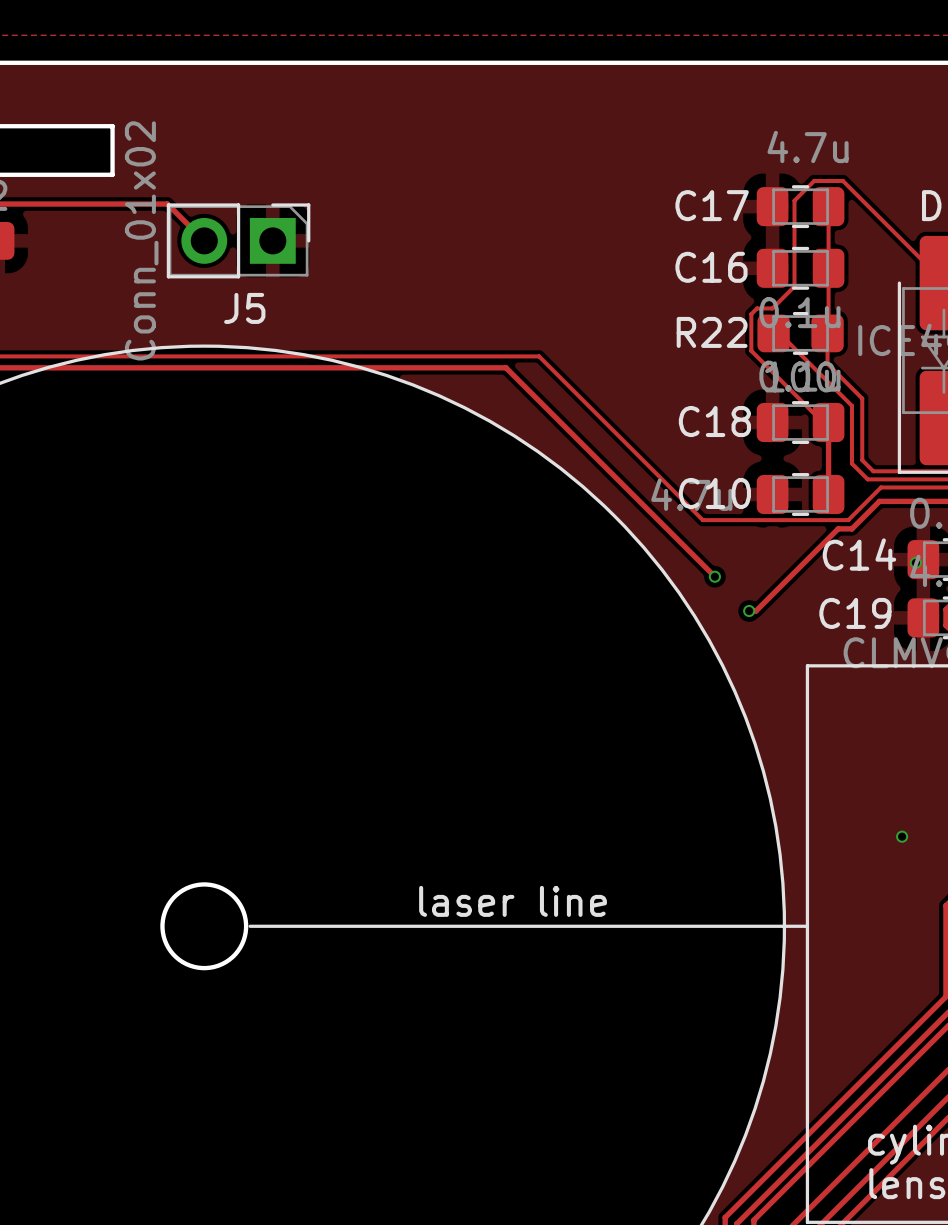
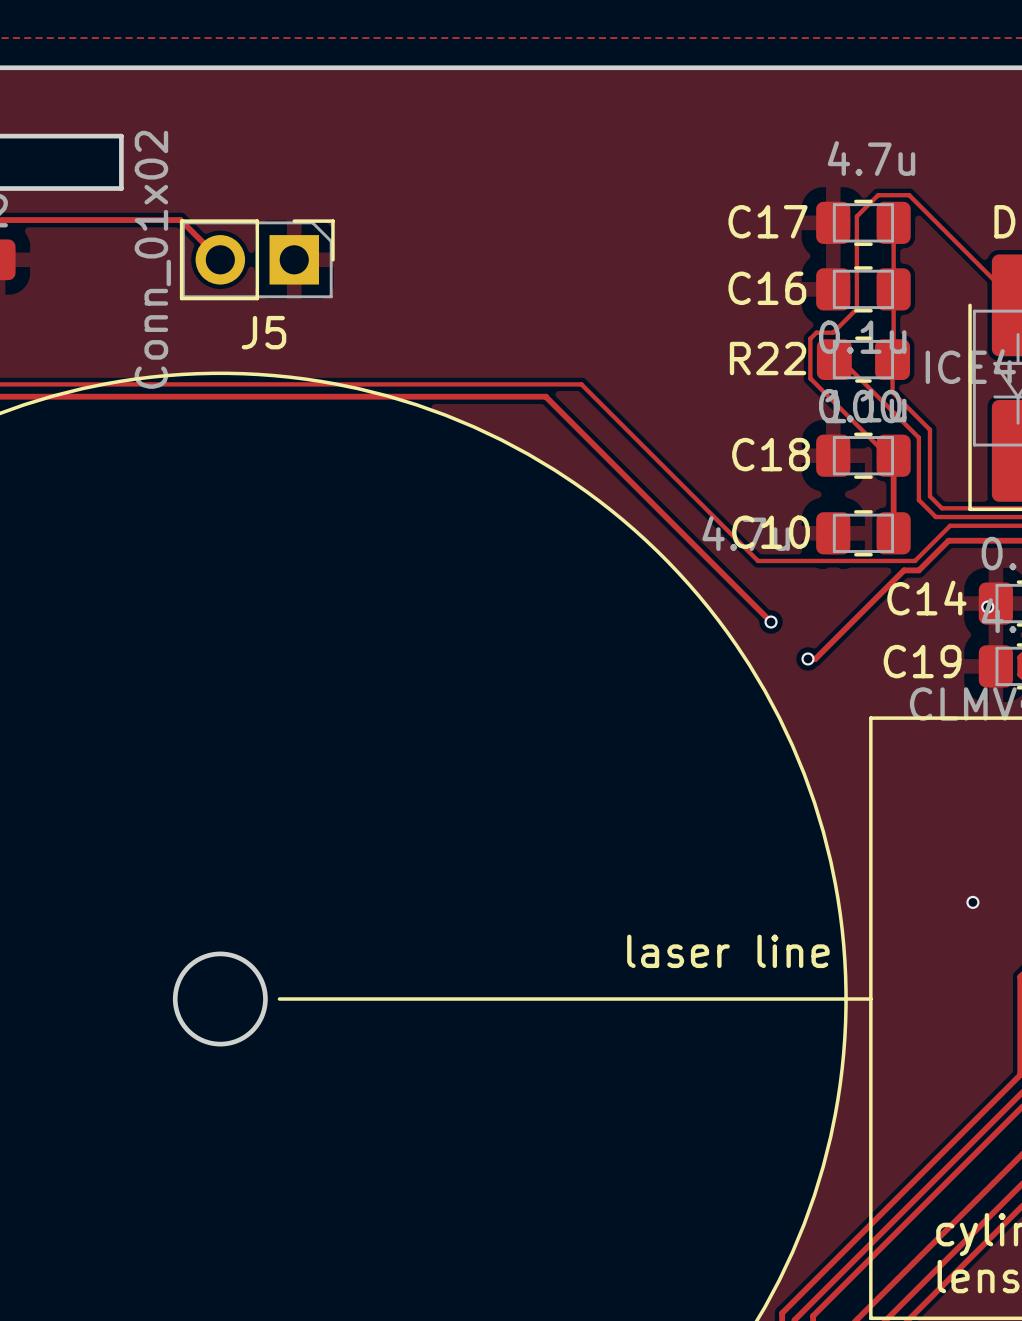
text position: laser line (513, 901) -> laser line (728, 951)
line: (250, 926) (259, 926) -> none

